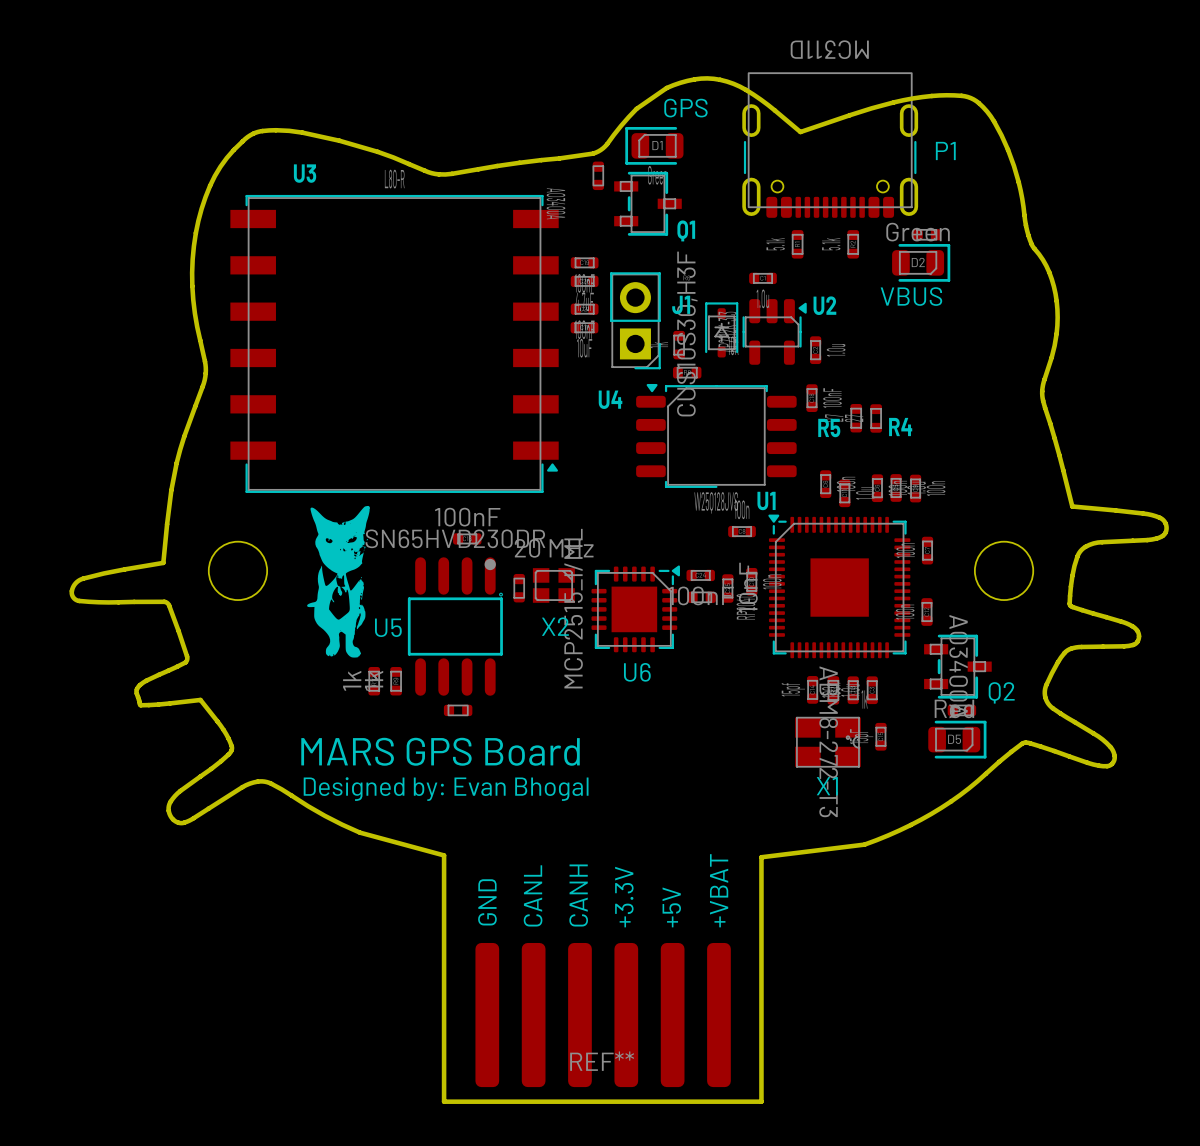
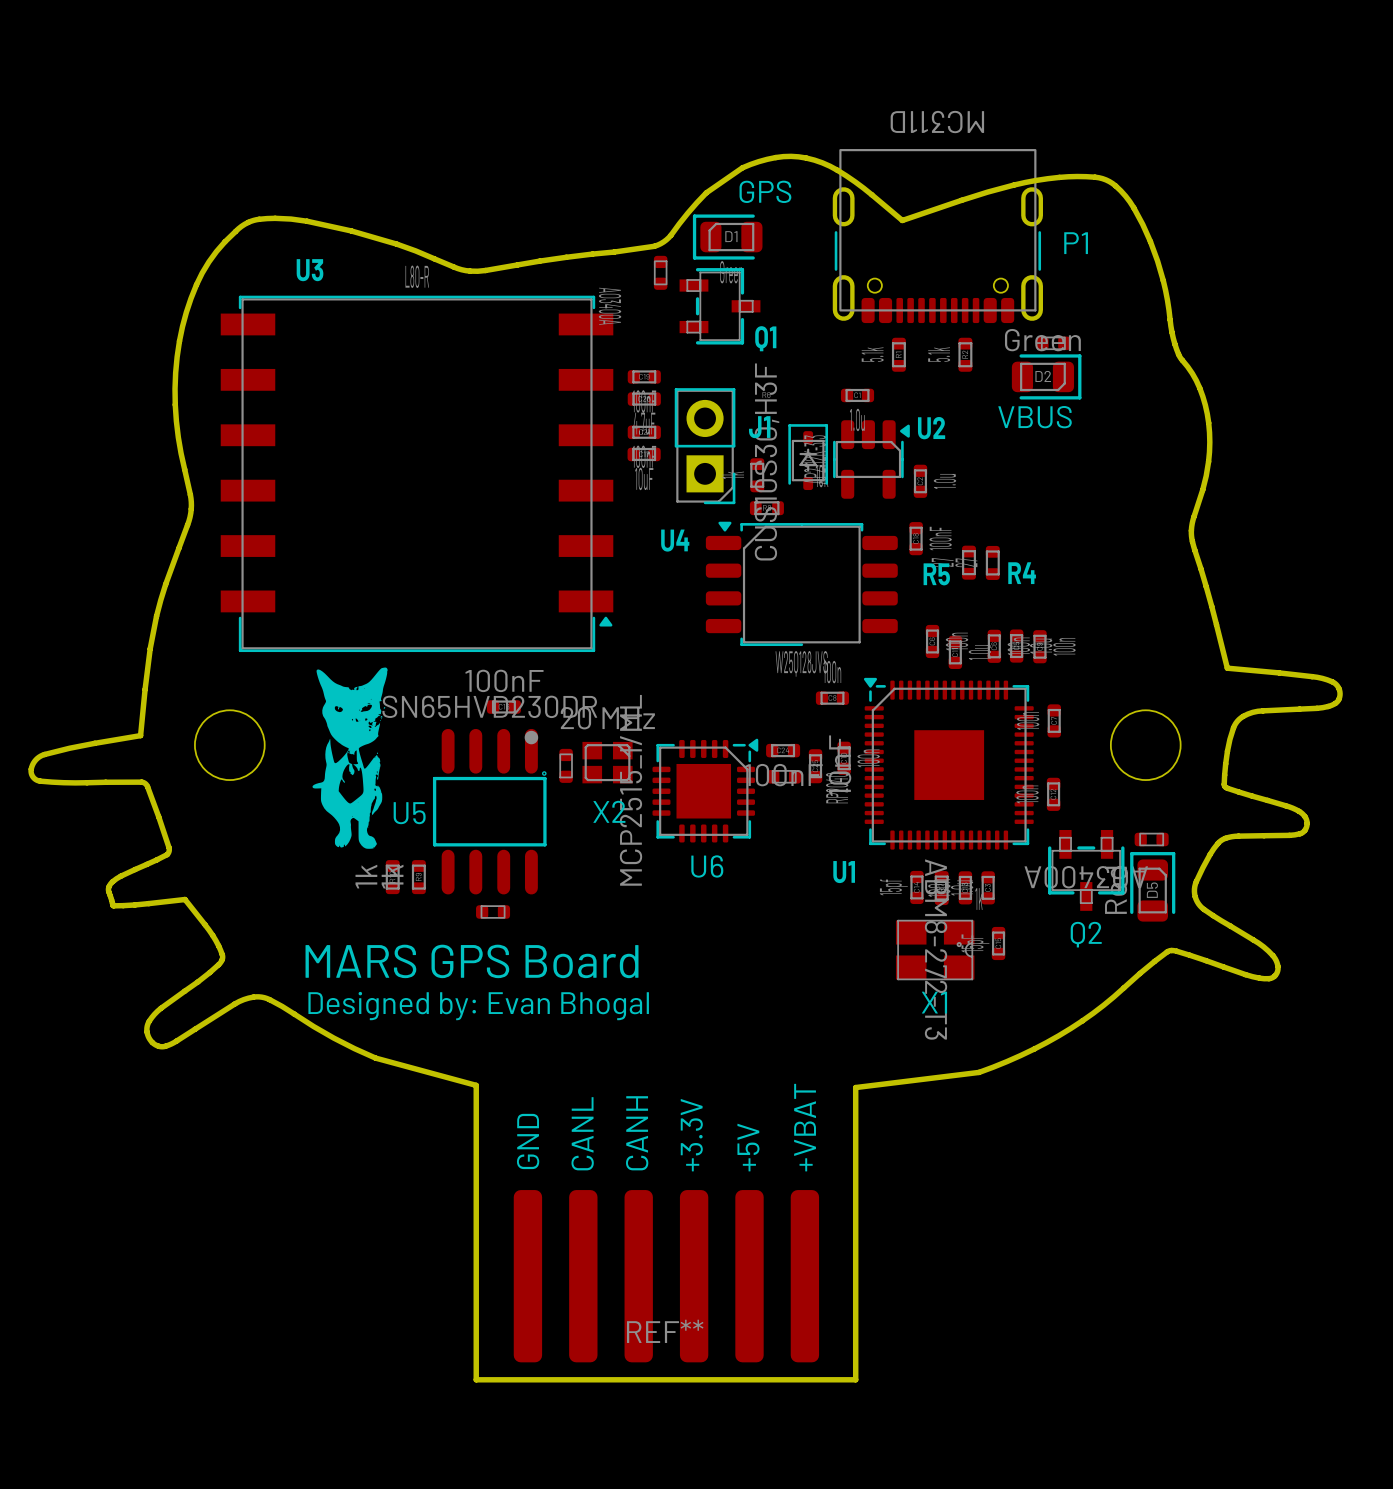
U1 name position: U1 (766, 501) -> U1 (844, 872)
Q2 rotation: 0° (957, 666) -> 90° clockwise (1086, 870)
part position: (961, 710) -> (1151, 839)
D5 rotation: 0° (957, 739) -> 90° counterclockwise (1152, 886)
D5 position: (957, 739) -> (1152, 886)

